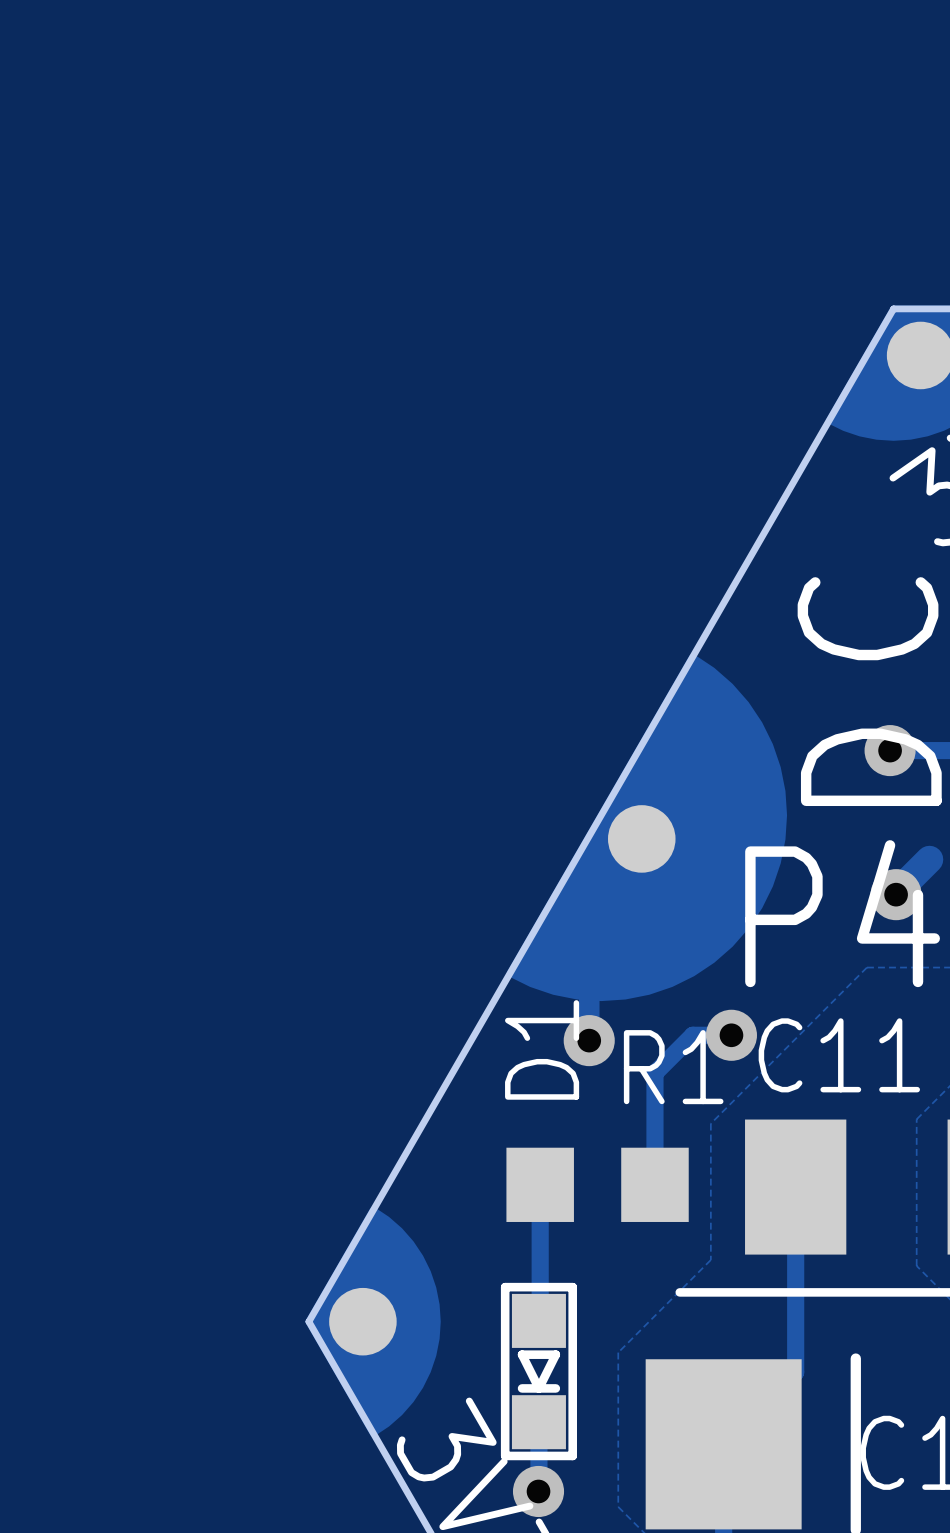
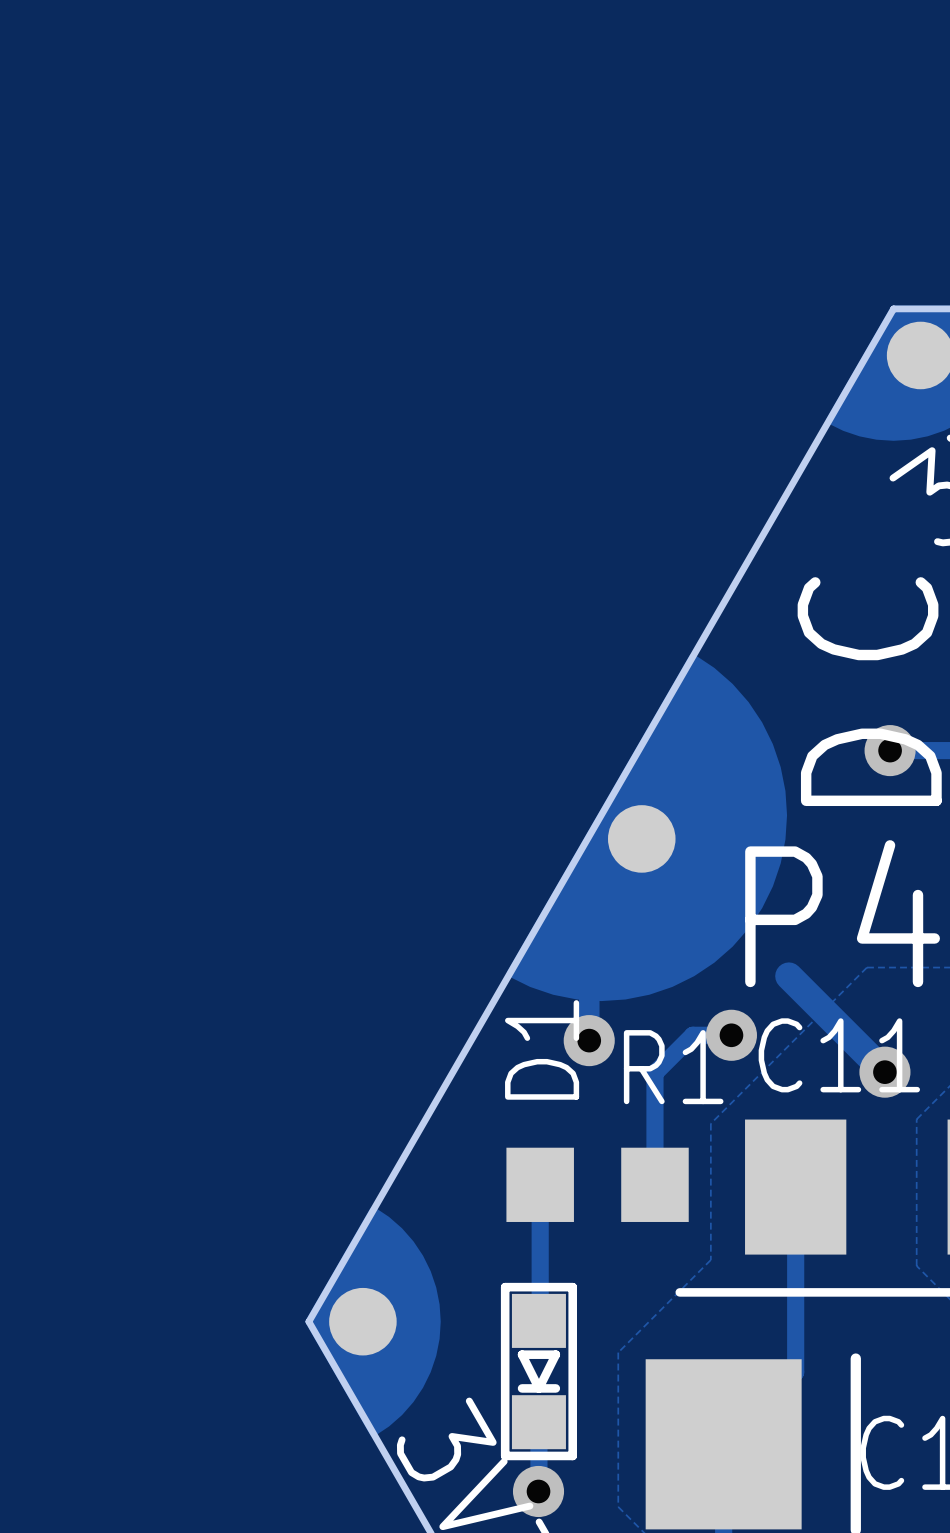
track: (929, 859) (896, 894) -> none
via position: (896, 894) -> (884, 1072)
track: none -> (788, 976) (884, 1072)

